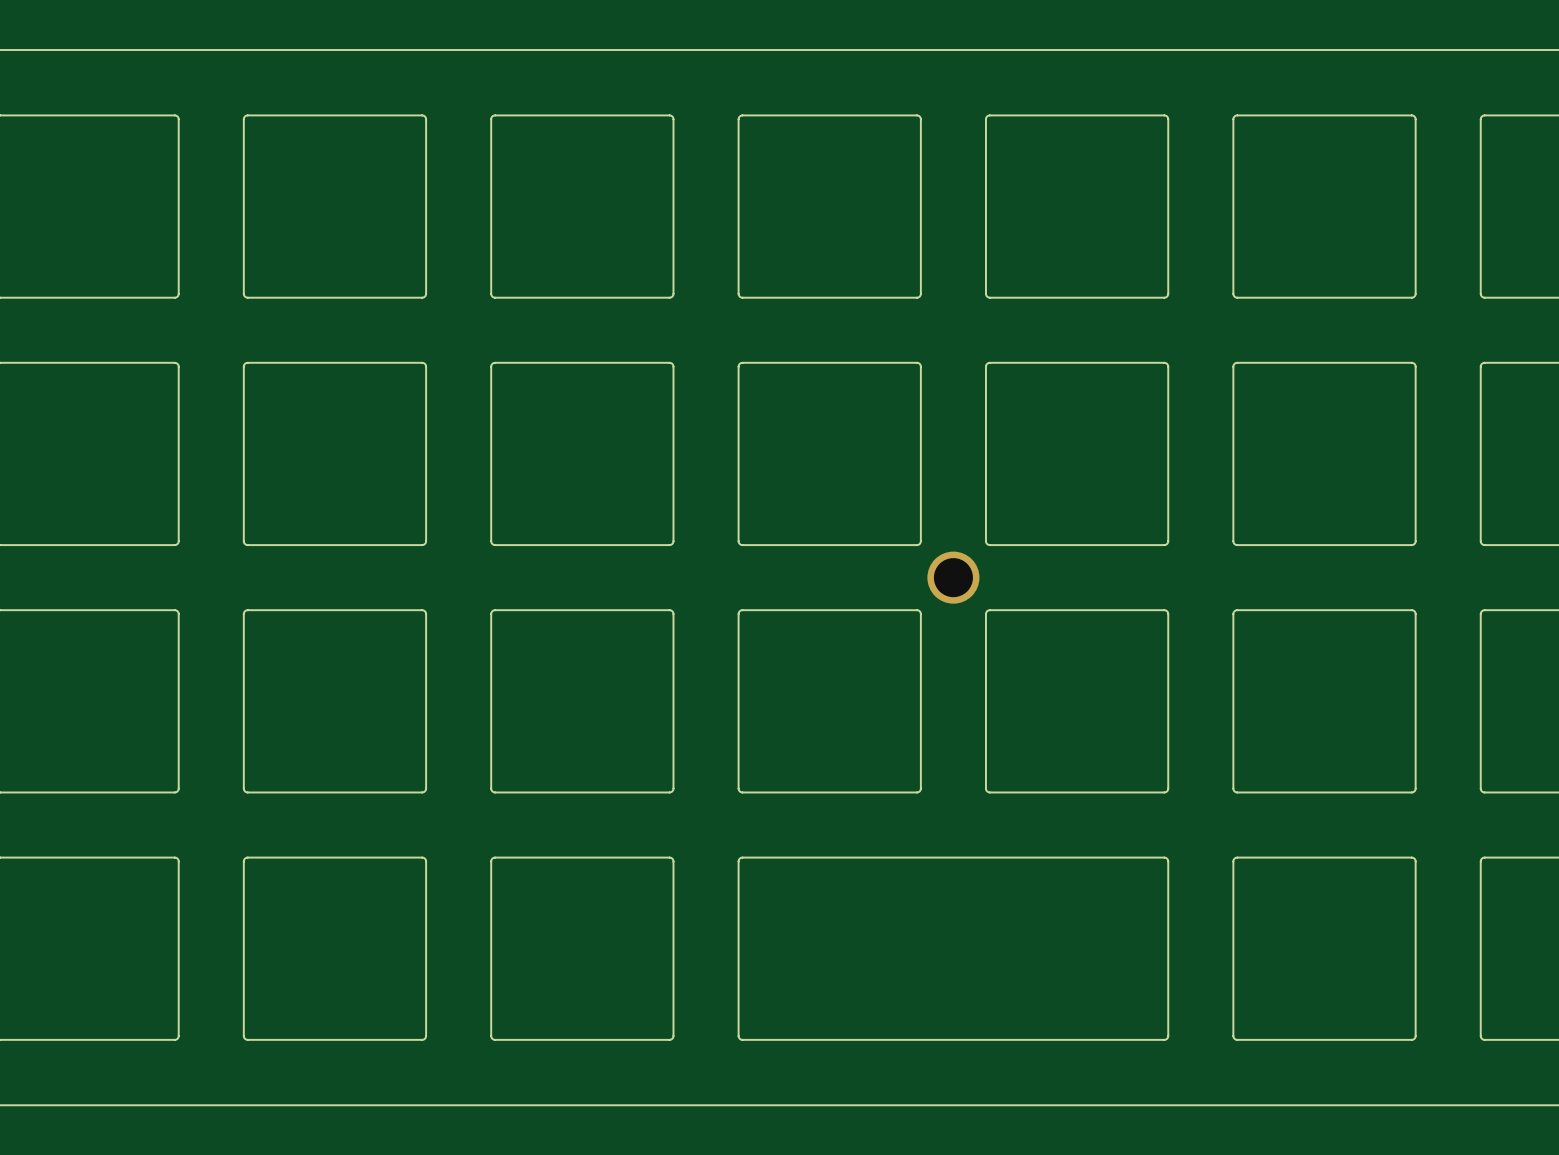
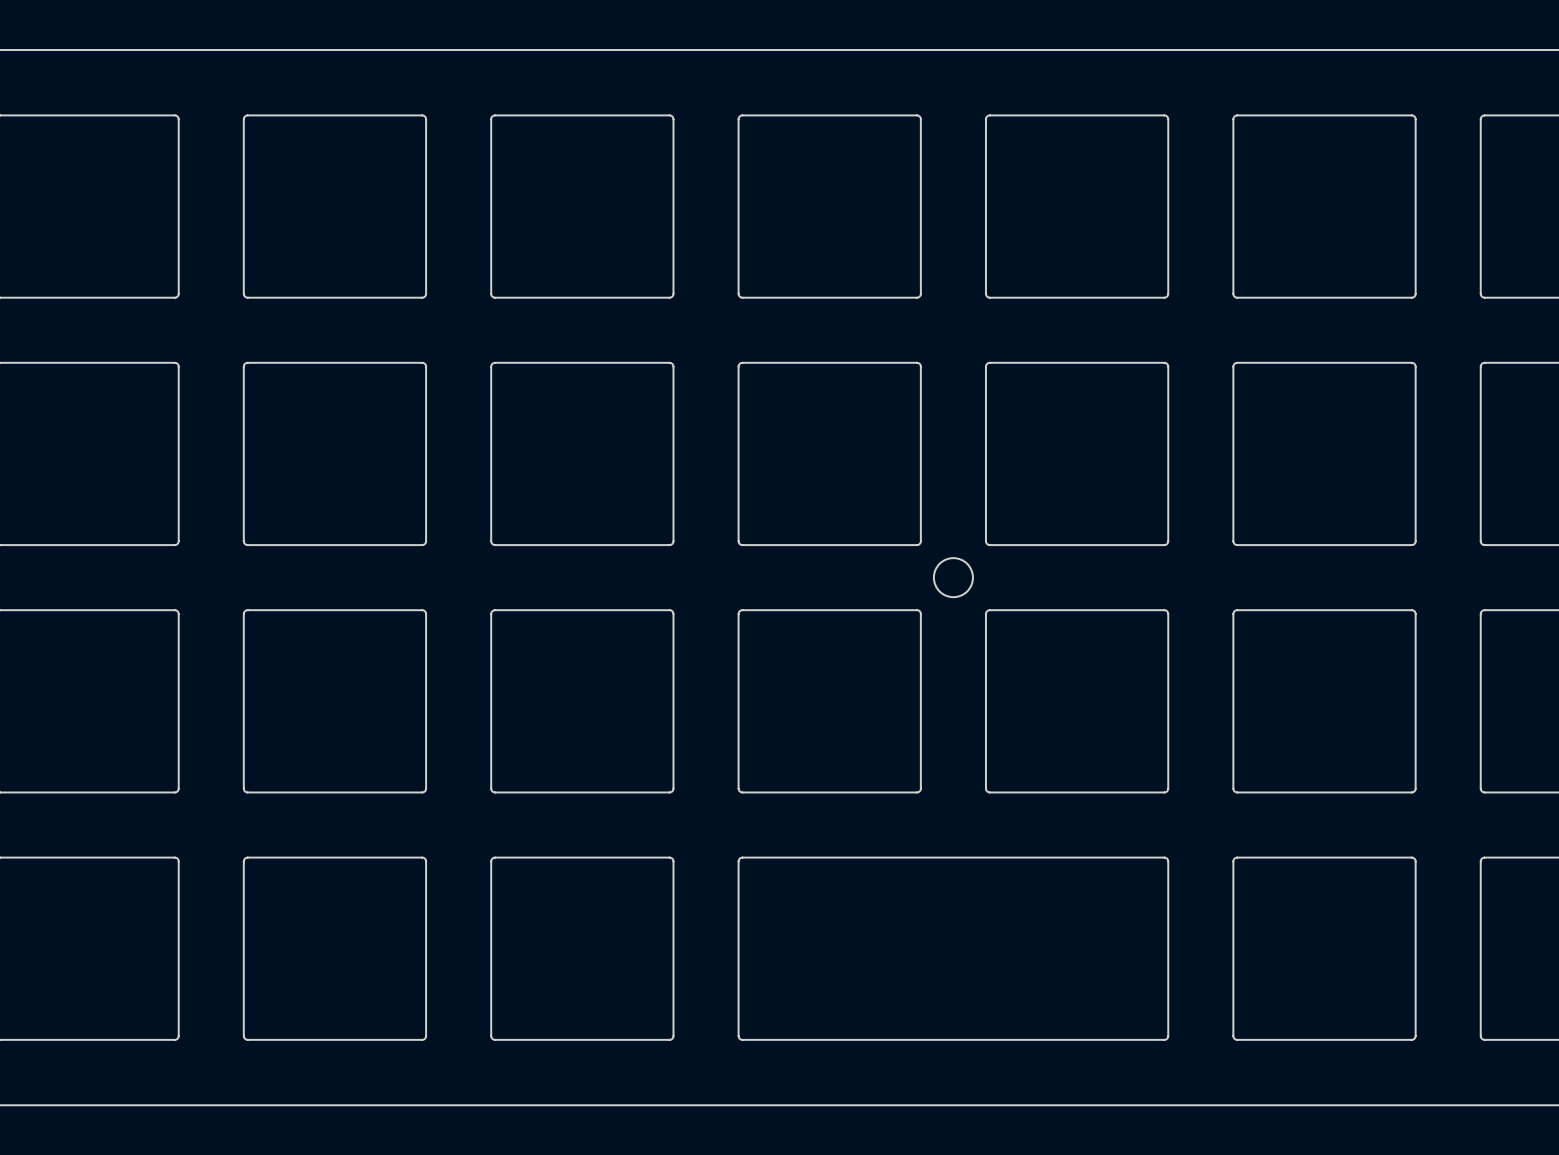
round board edge: none -> [932, 557, 974, 599]
via: (953, 577) -> none

